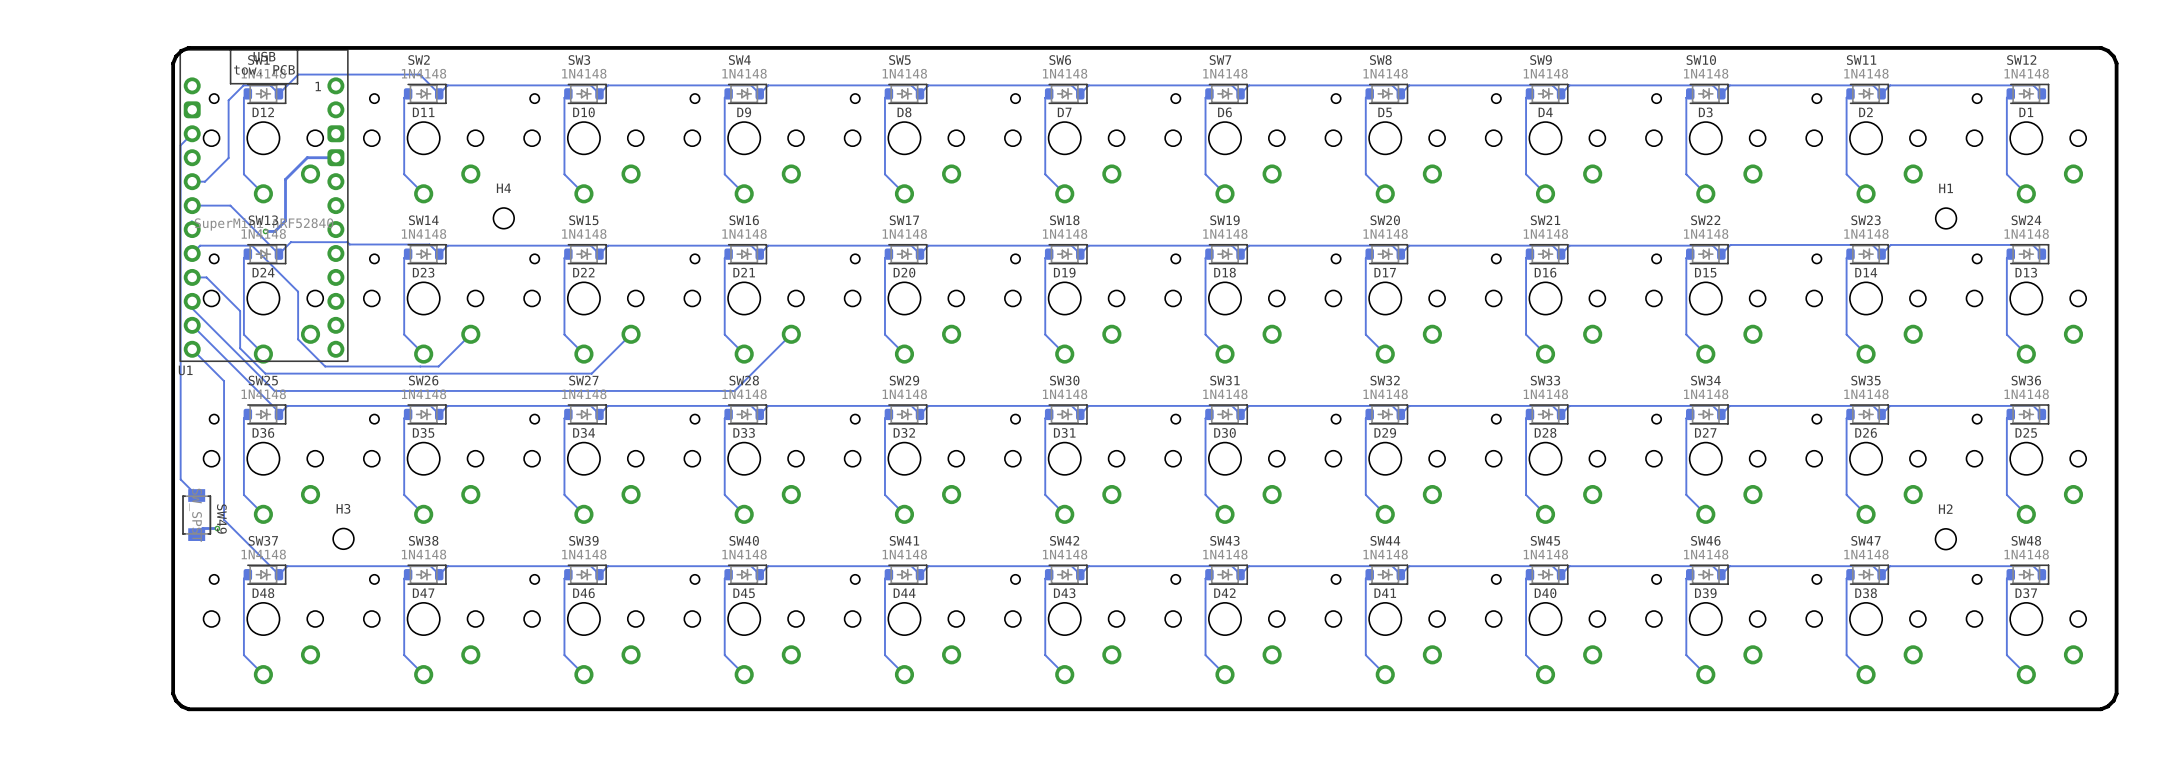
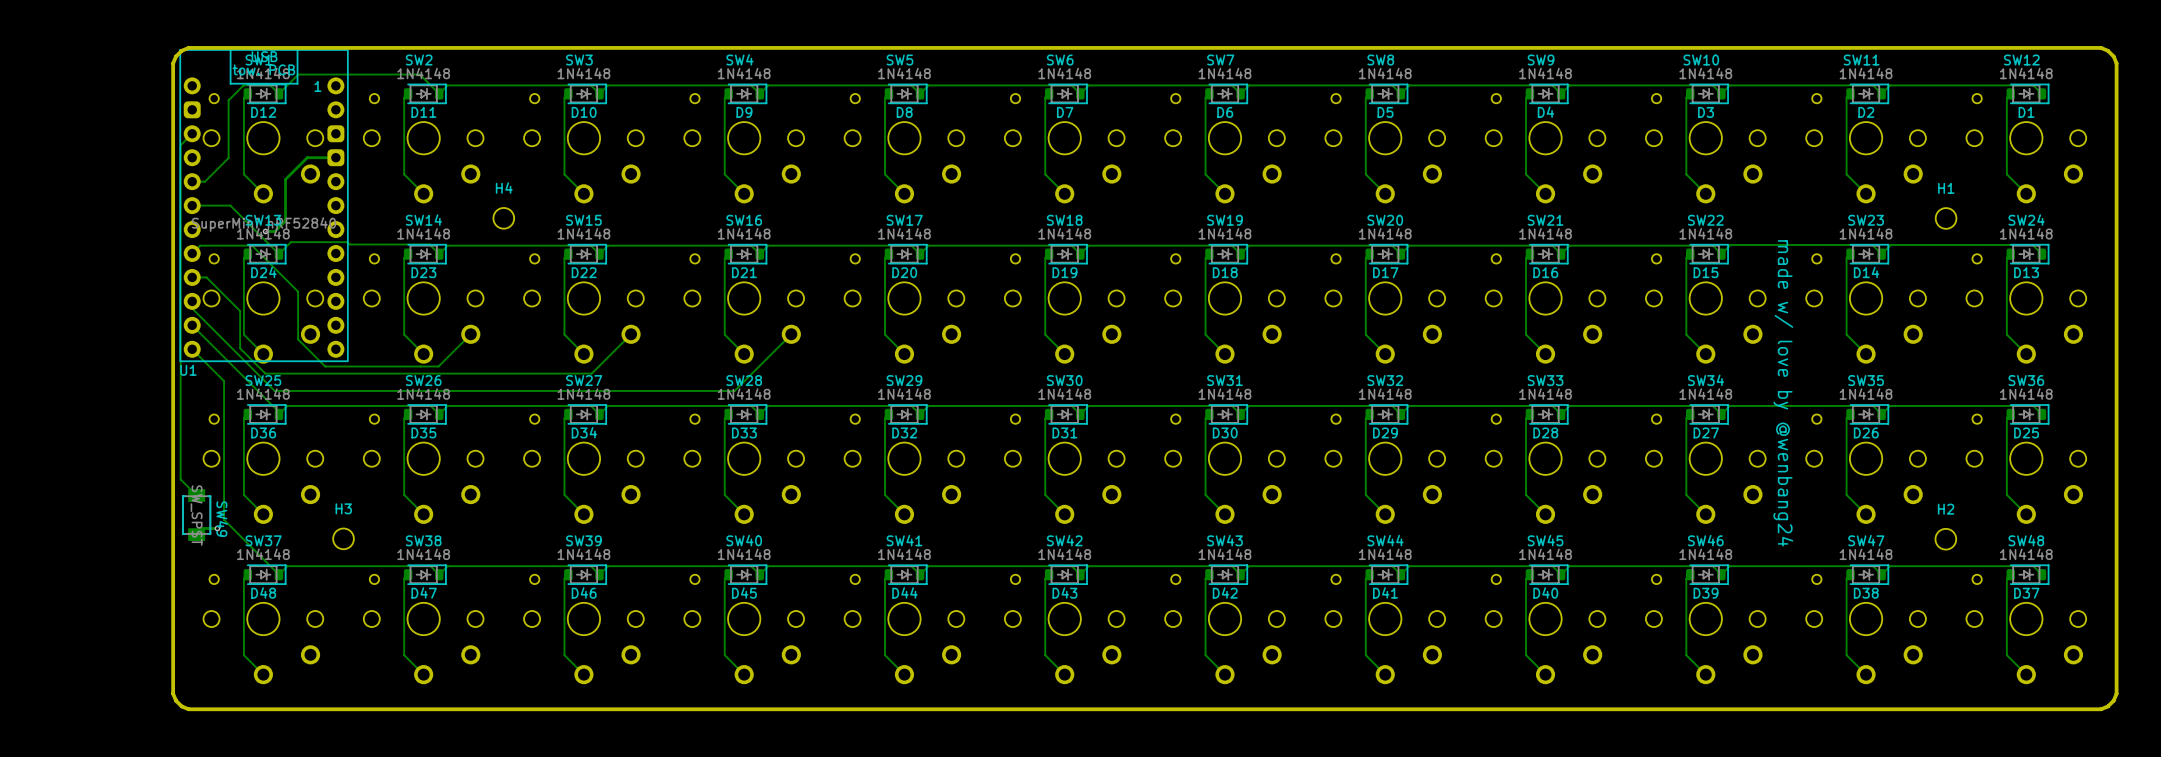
text: none -> made w/ love by @wenbang24 (1783, 393)

